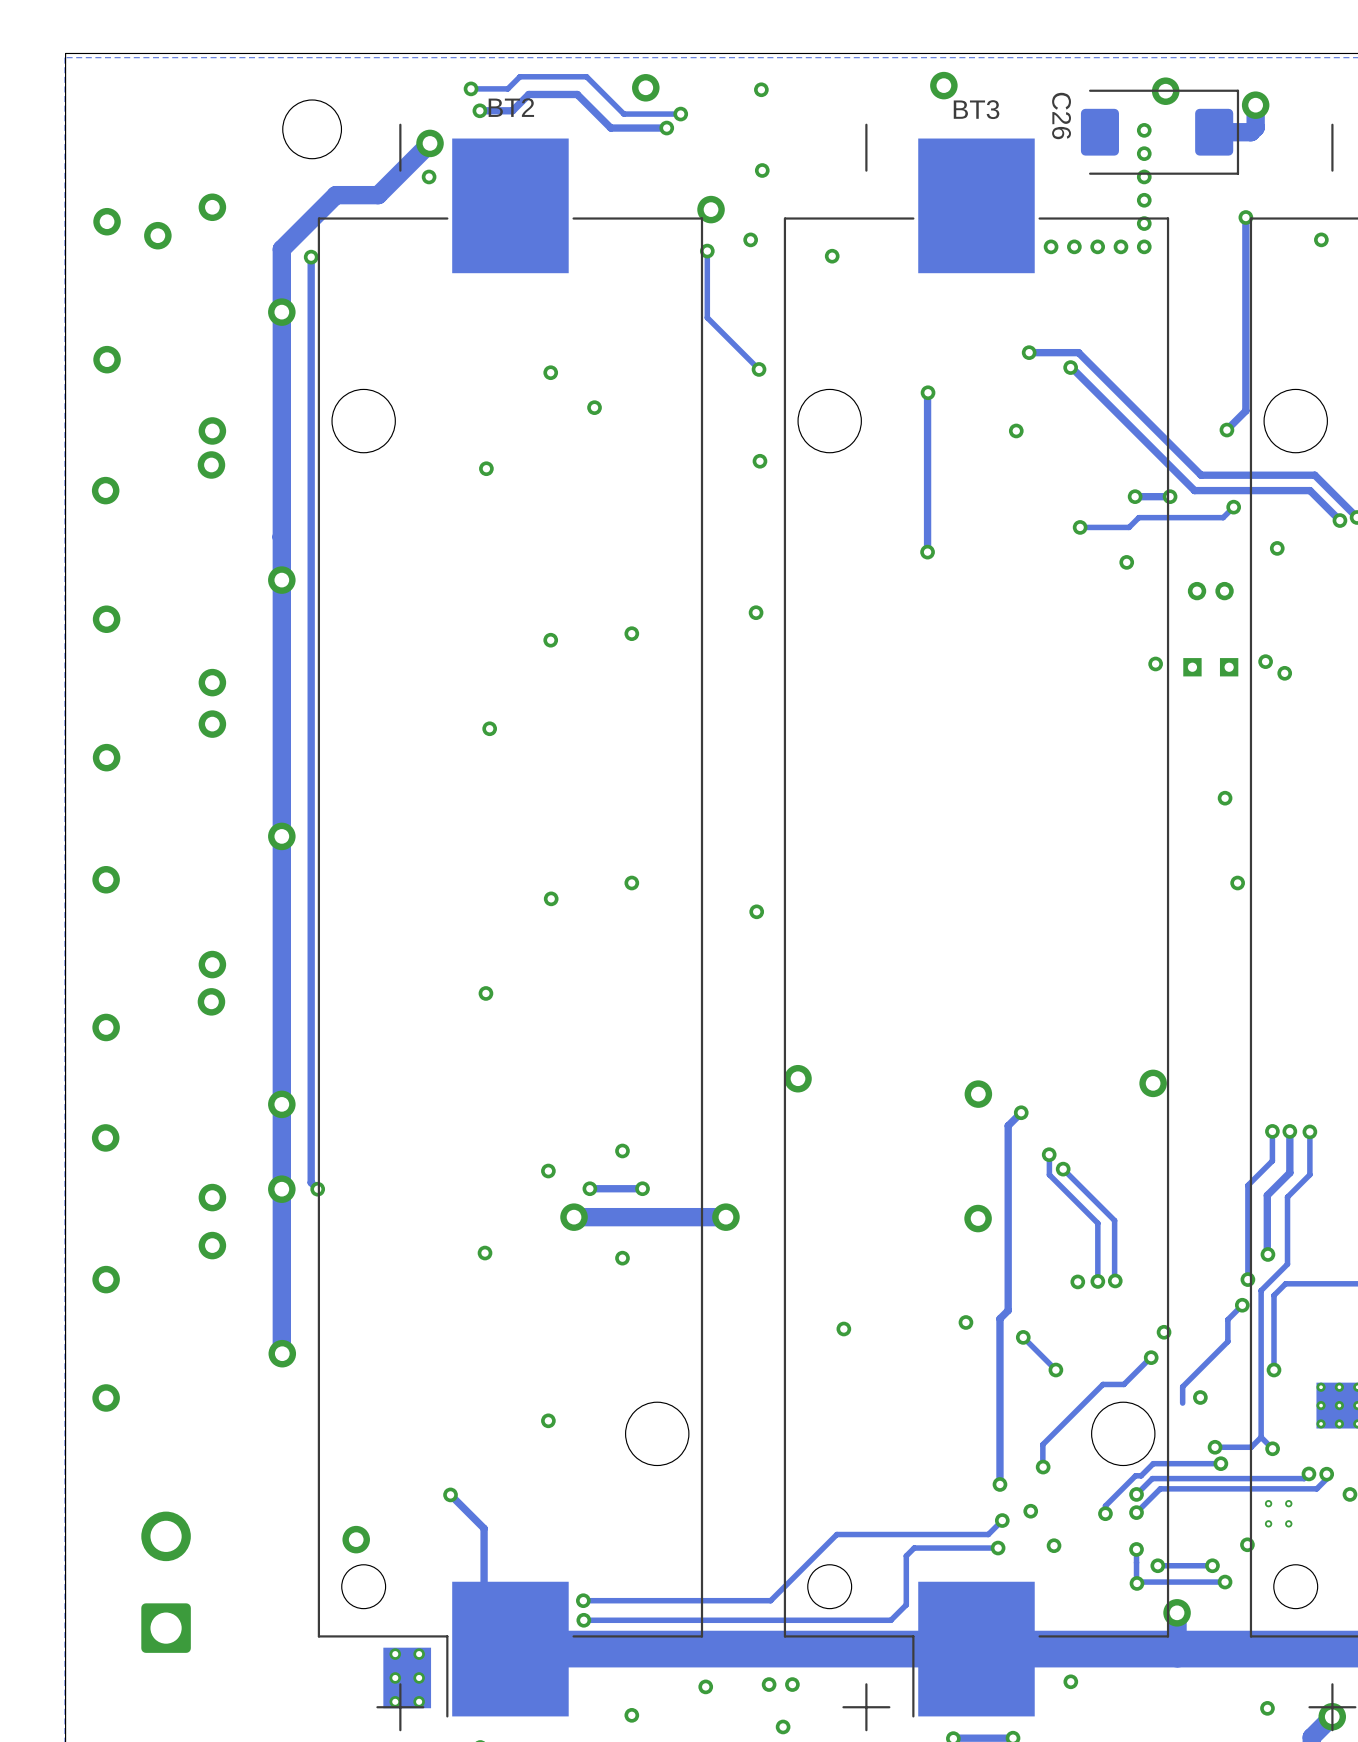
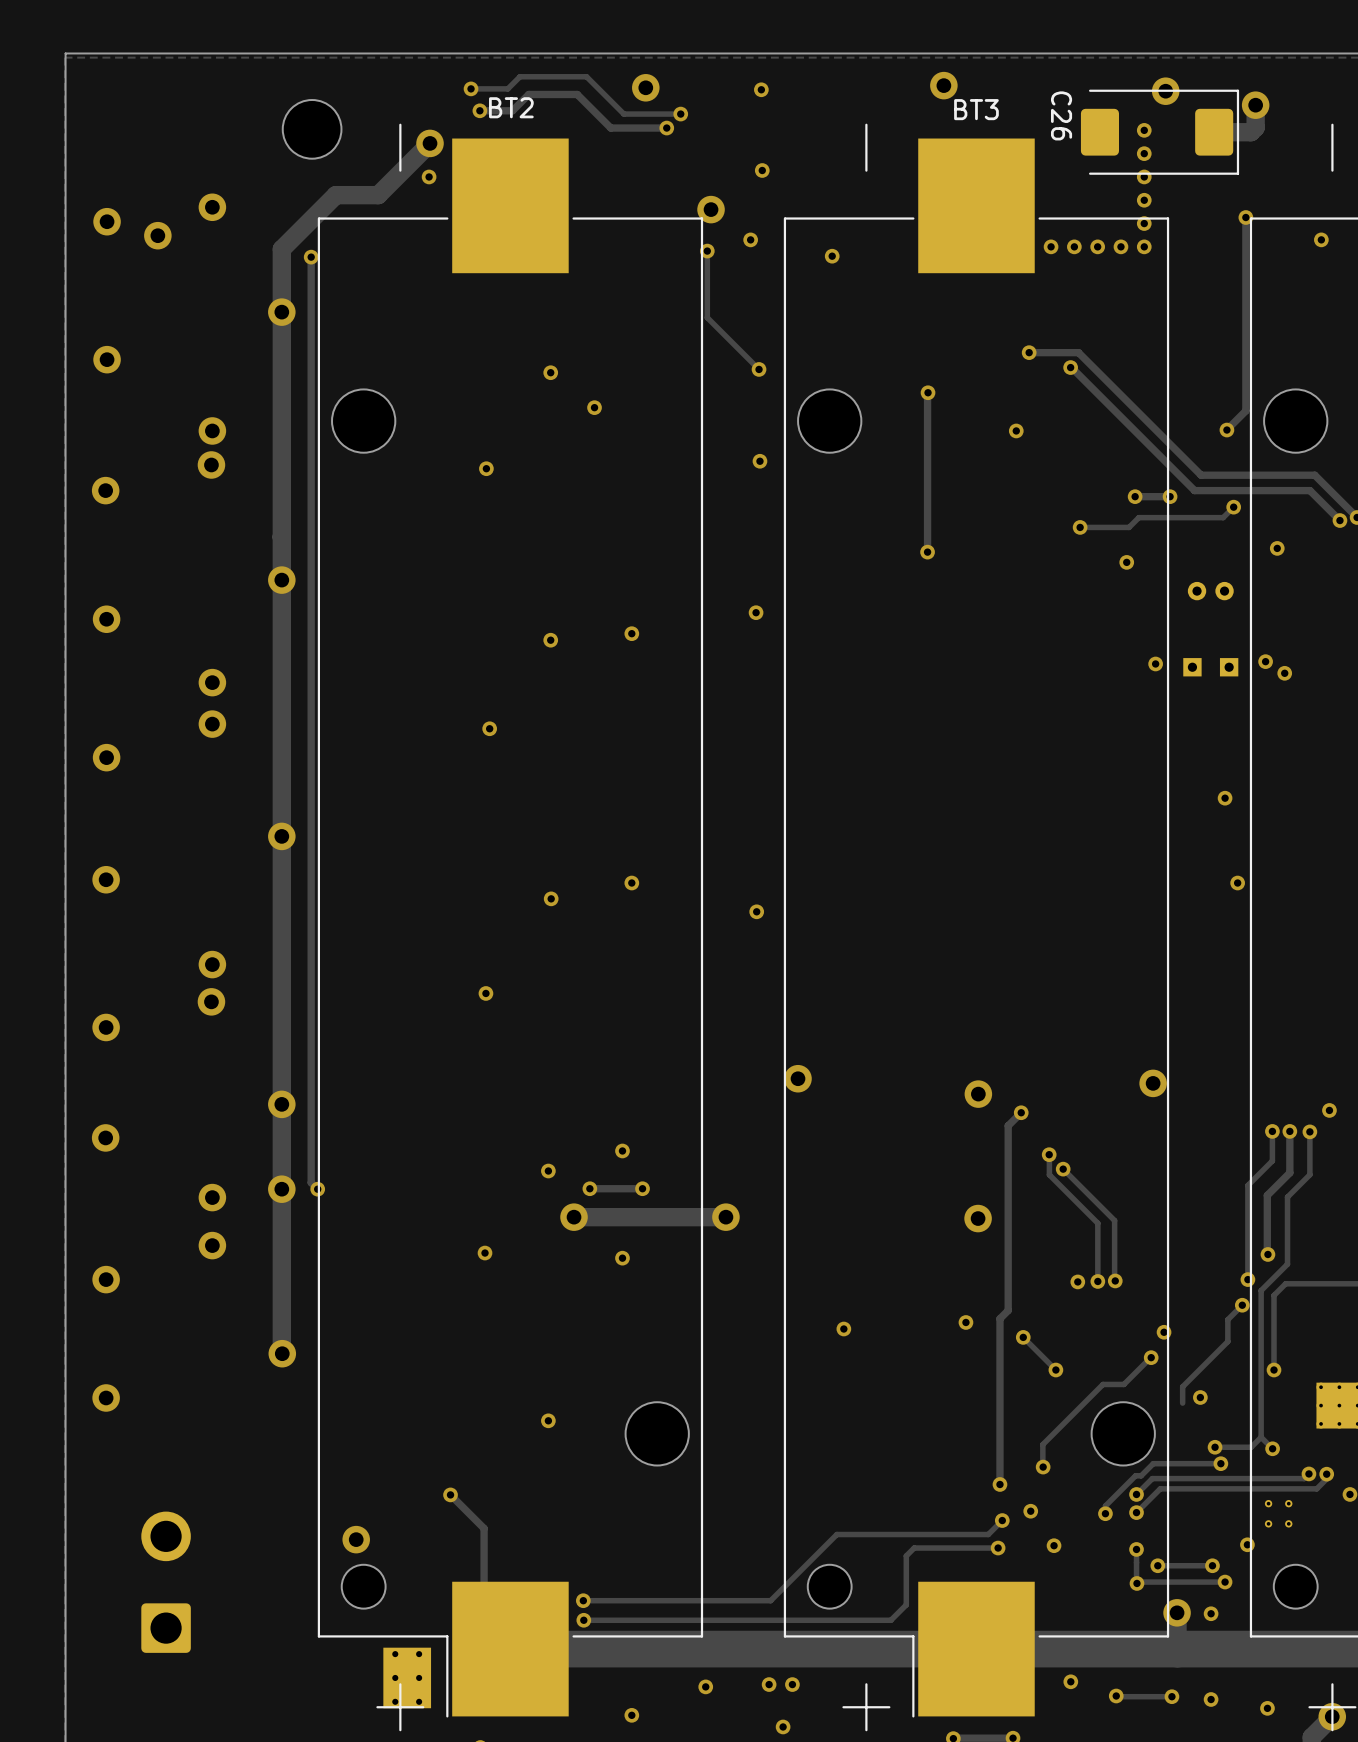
via: none -> (1329, 1110)
via: none -> (1211, 1613)
track: none -> (1116, 1696) (1171, 1696)
via: none -> (1116, 1696)
via: none -> (1171, 1696)
via: none -> (1211, 1699)

